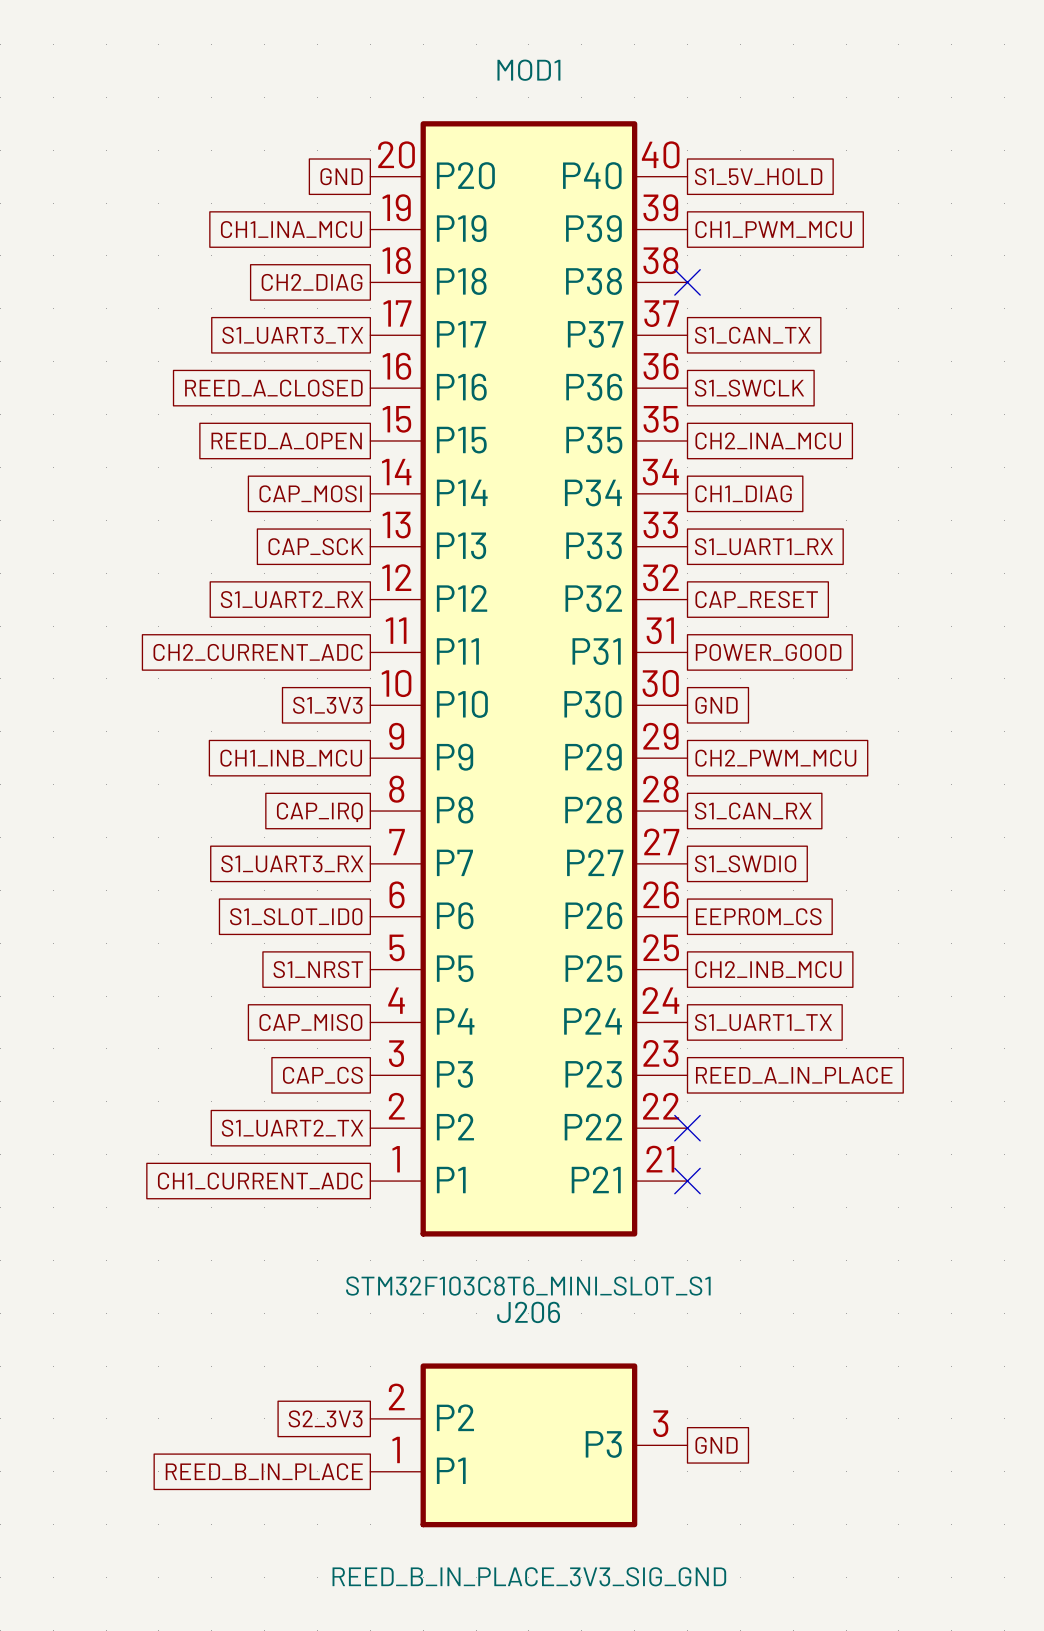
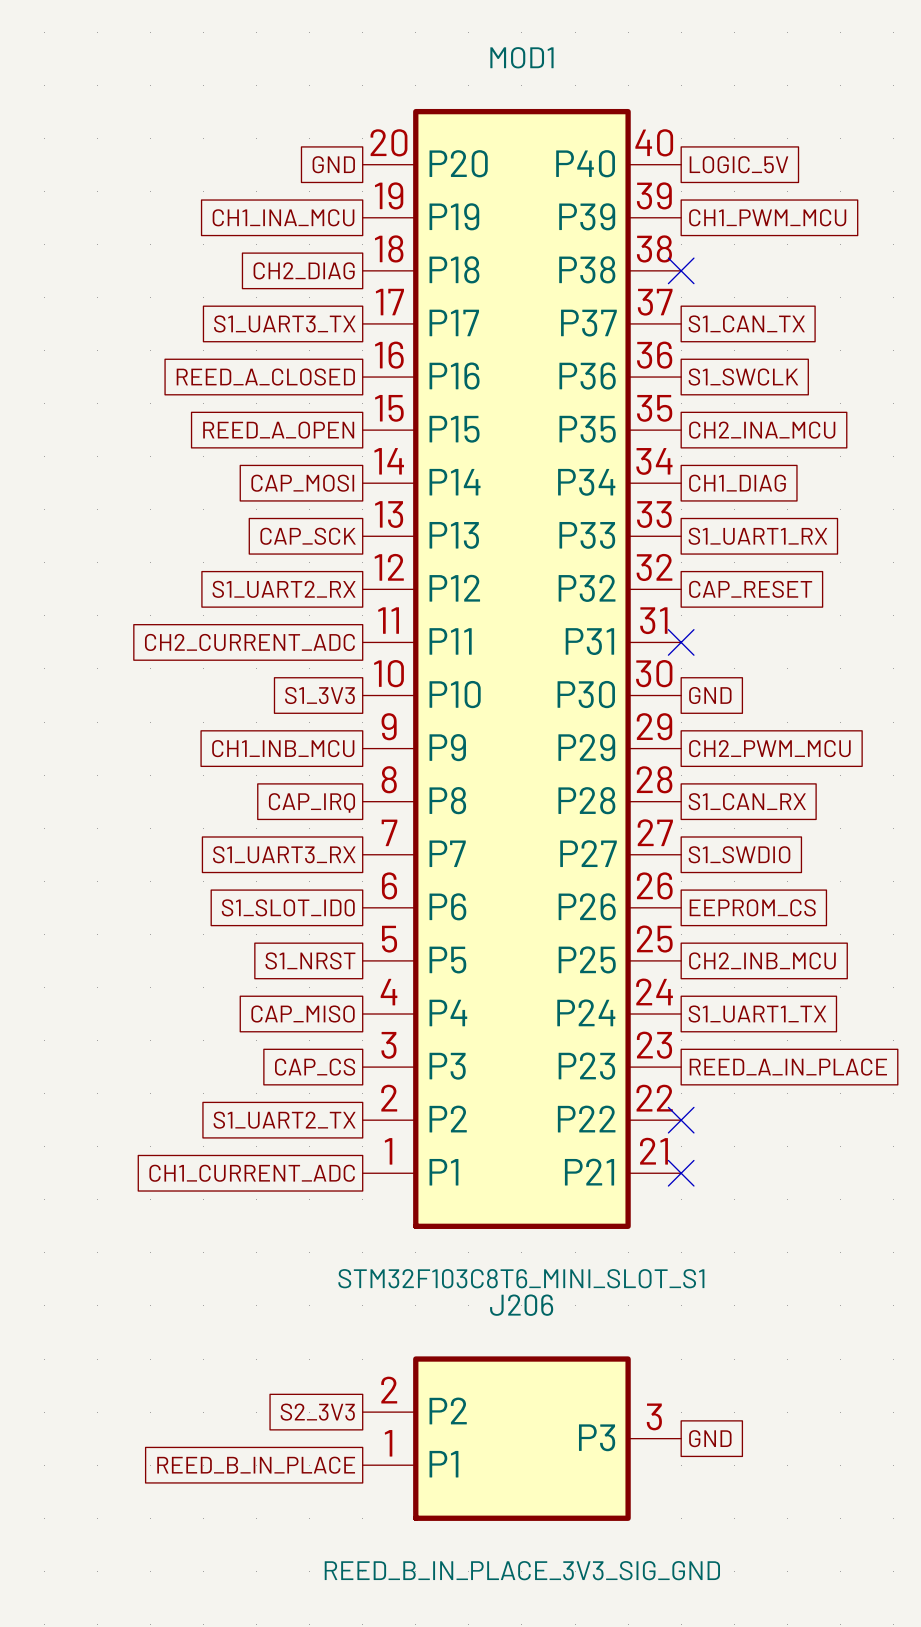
global label: S1_5V_HOLD (758, 176) -> LOGIC_5V (739, 164)
no-connect mark: none -> (681, 642)
global label: POWER_GOOD (768, 652) -> none

